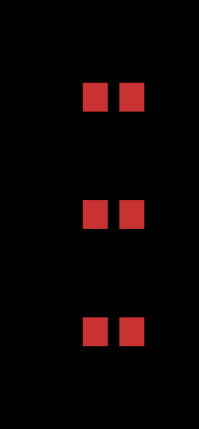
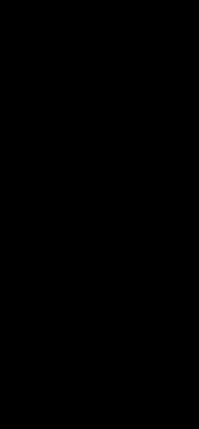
part: (113, 97) -> none
part: (113, 214) -> none
part: (113, 331) -> none

